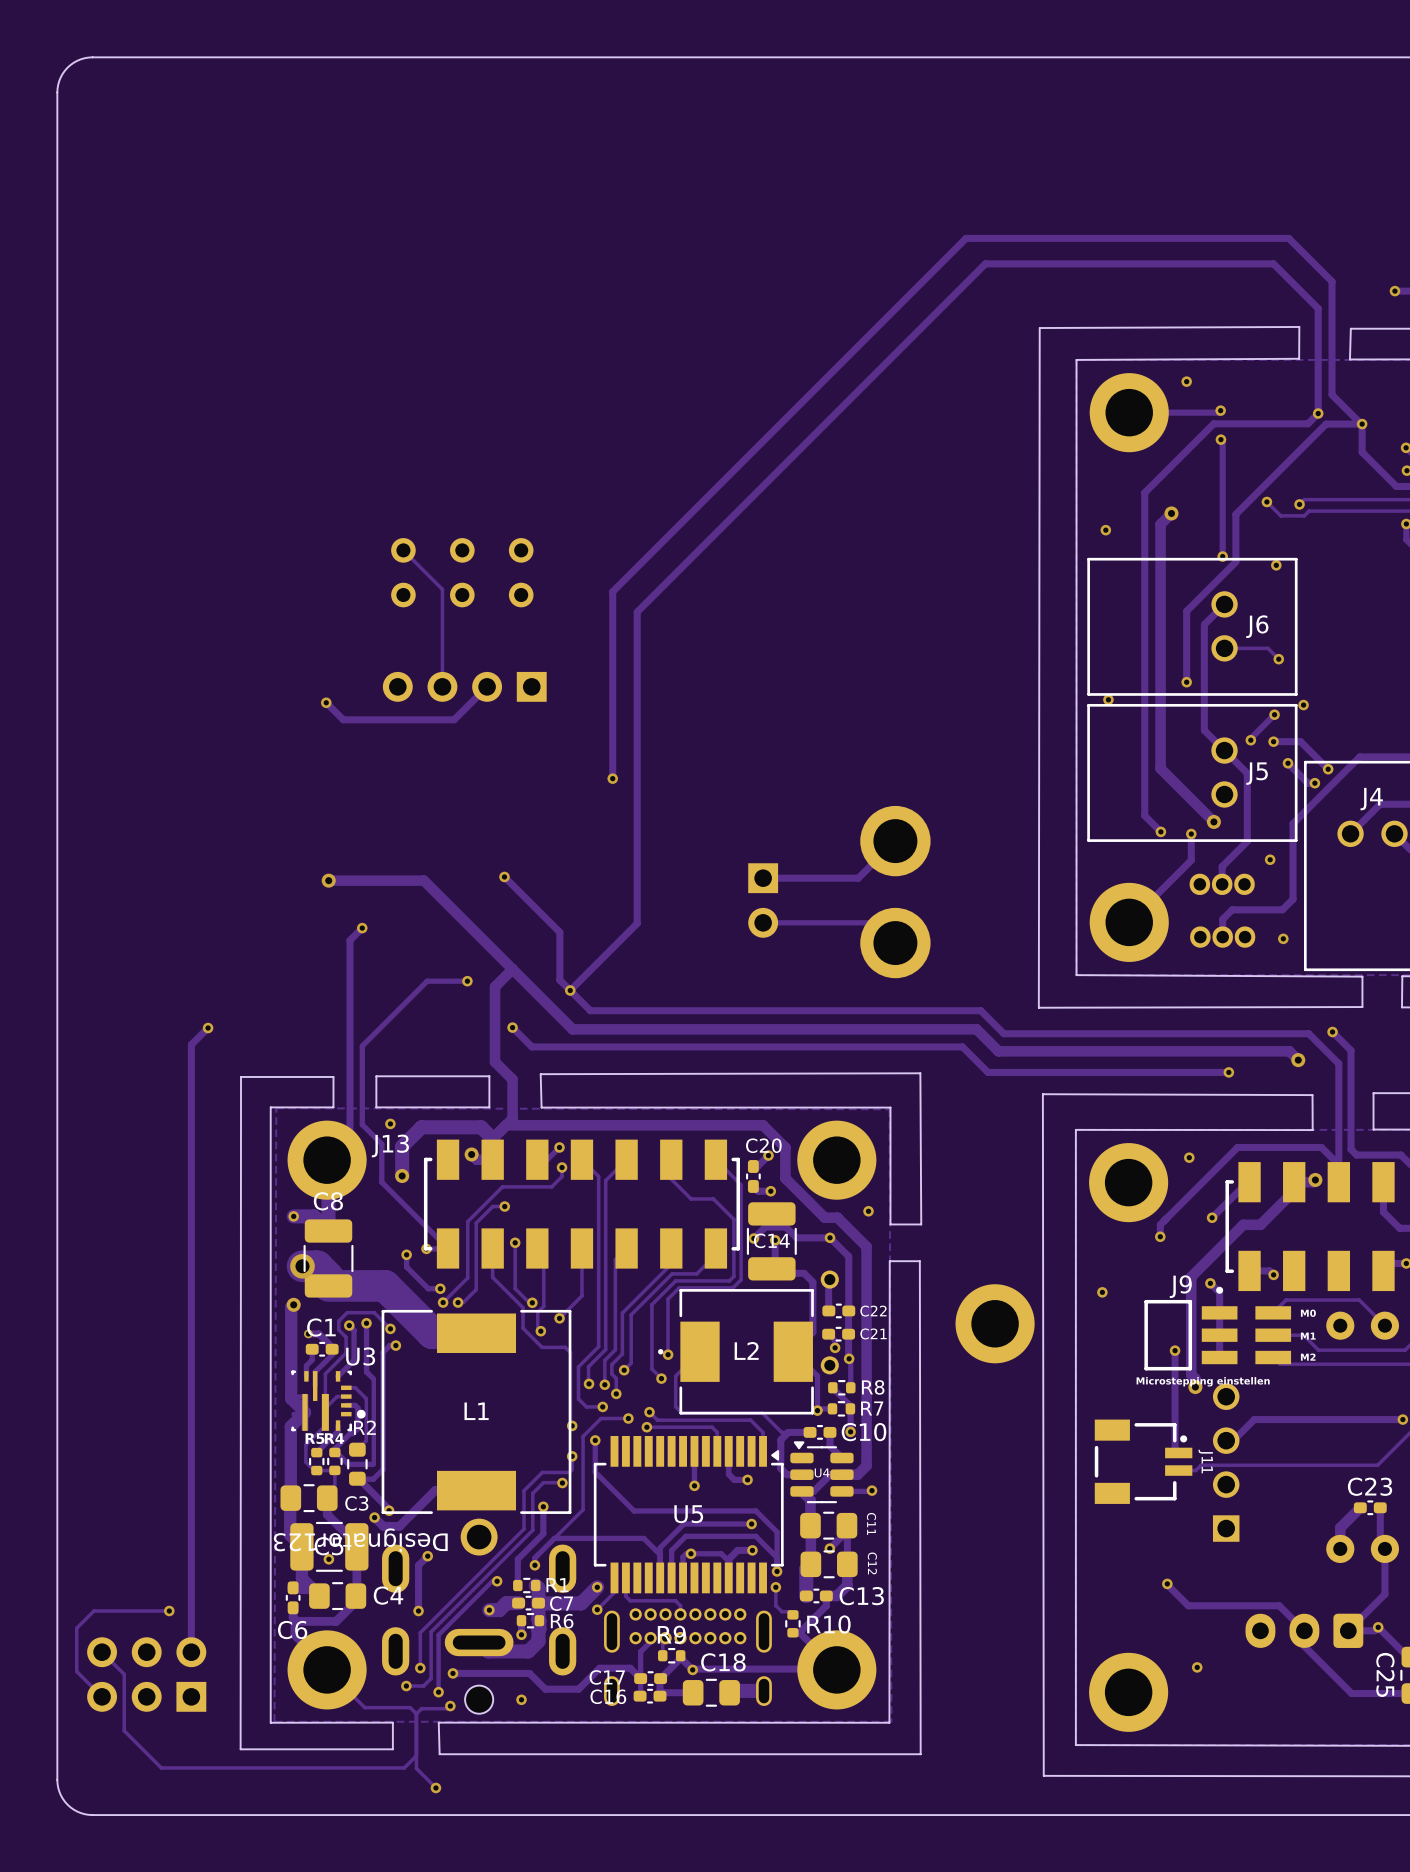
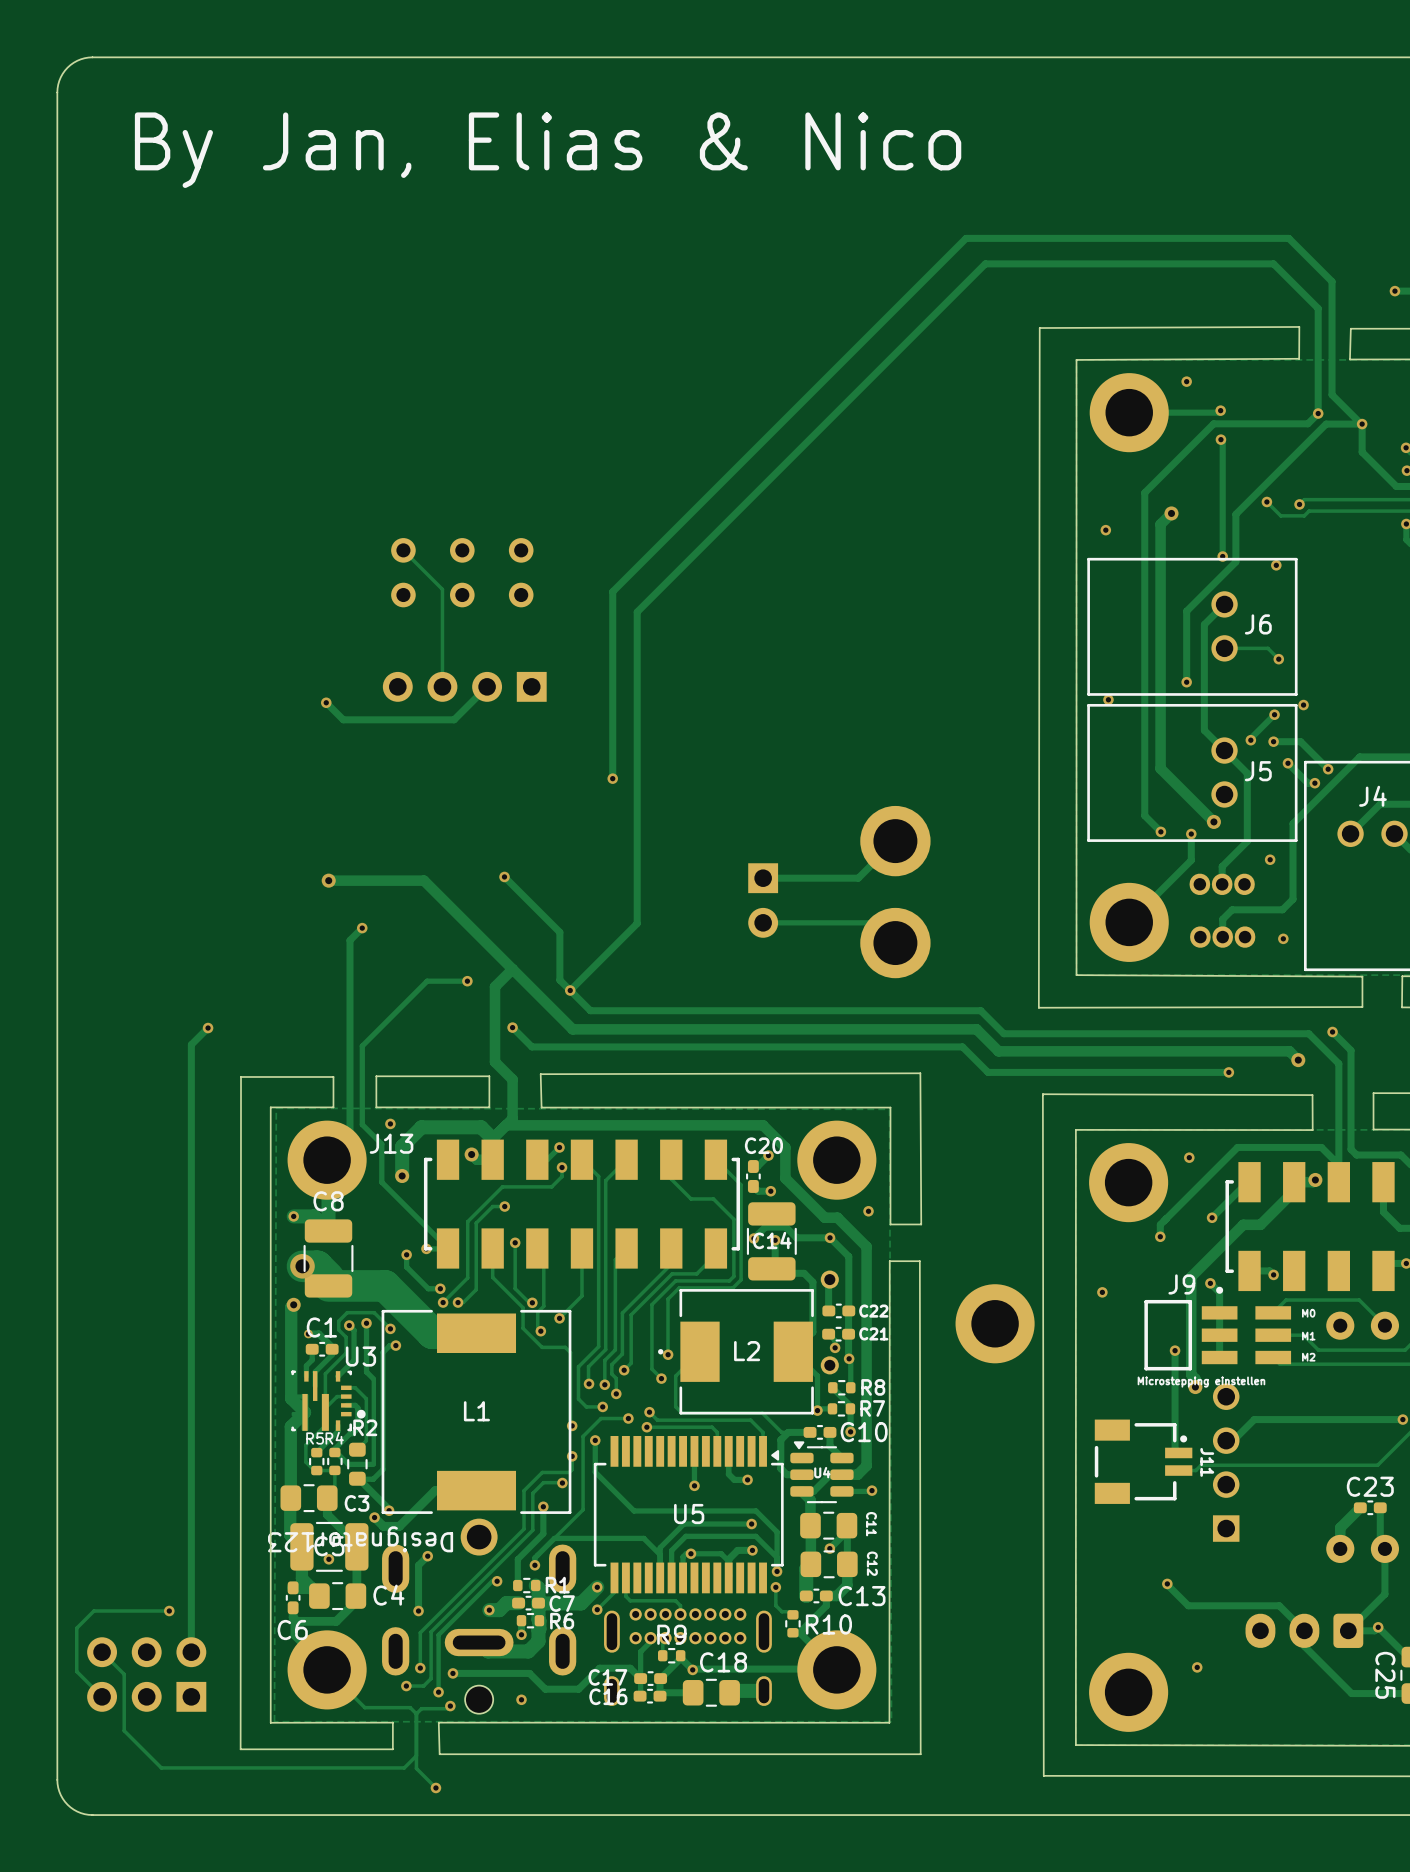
text: none -> By Jan, Elias & Nico (548, 150)

